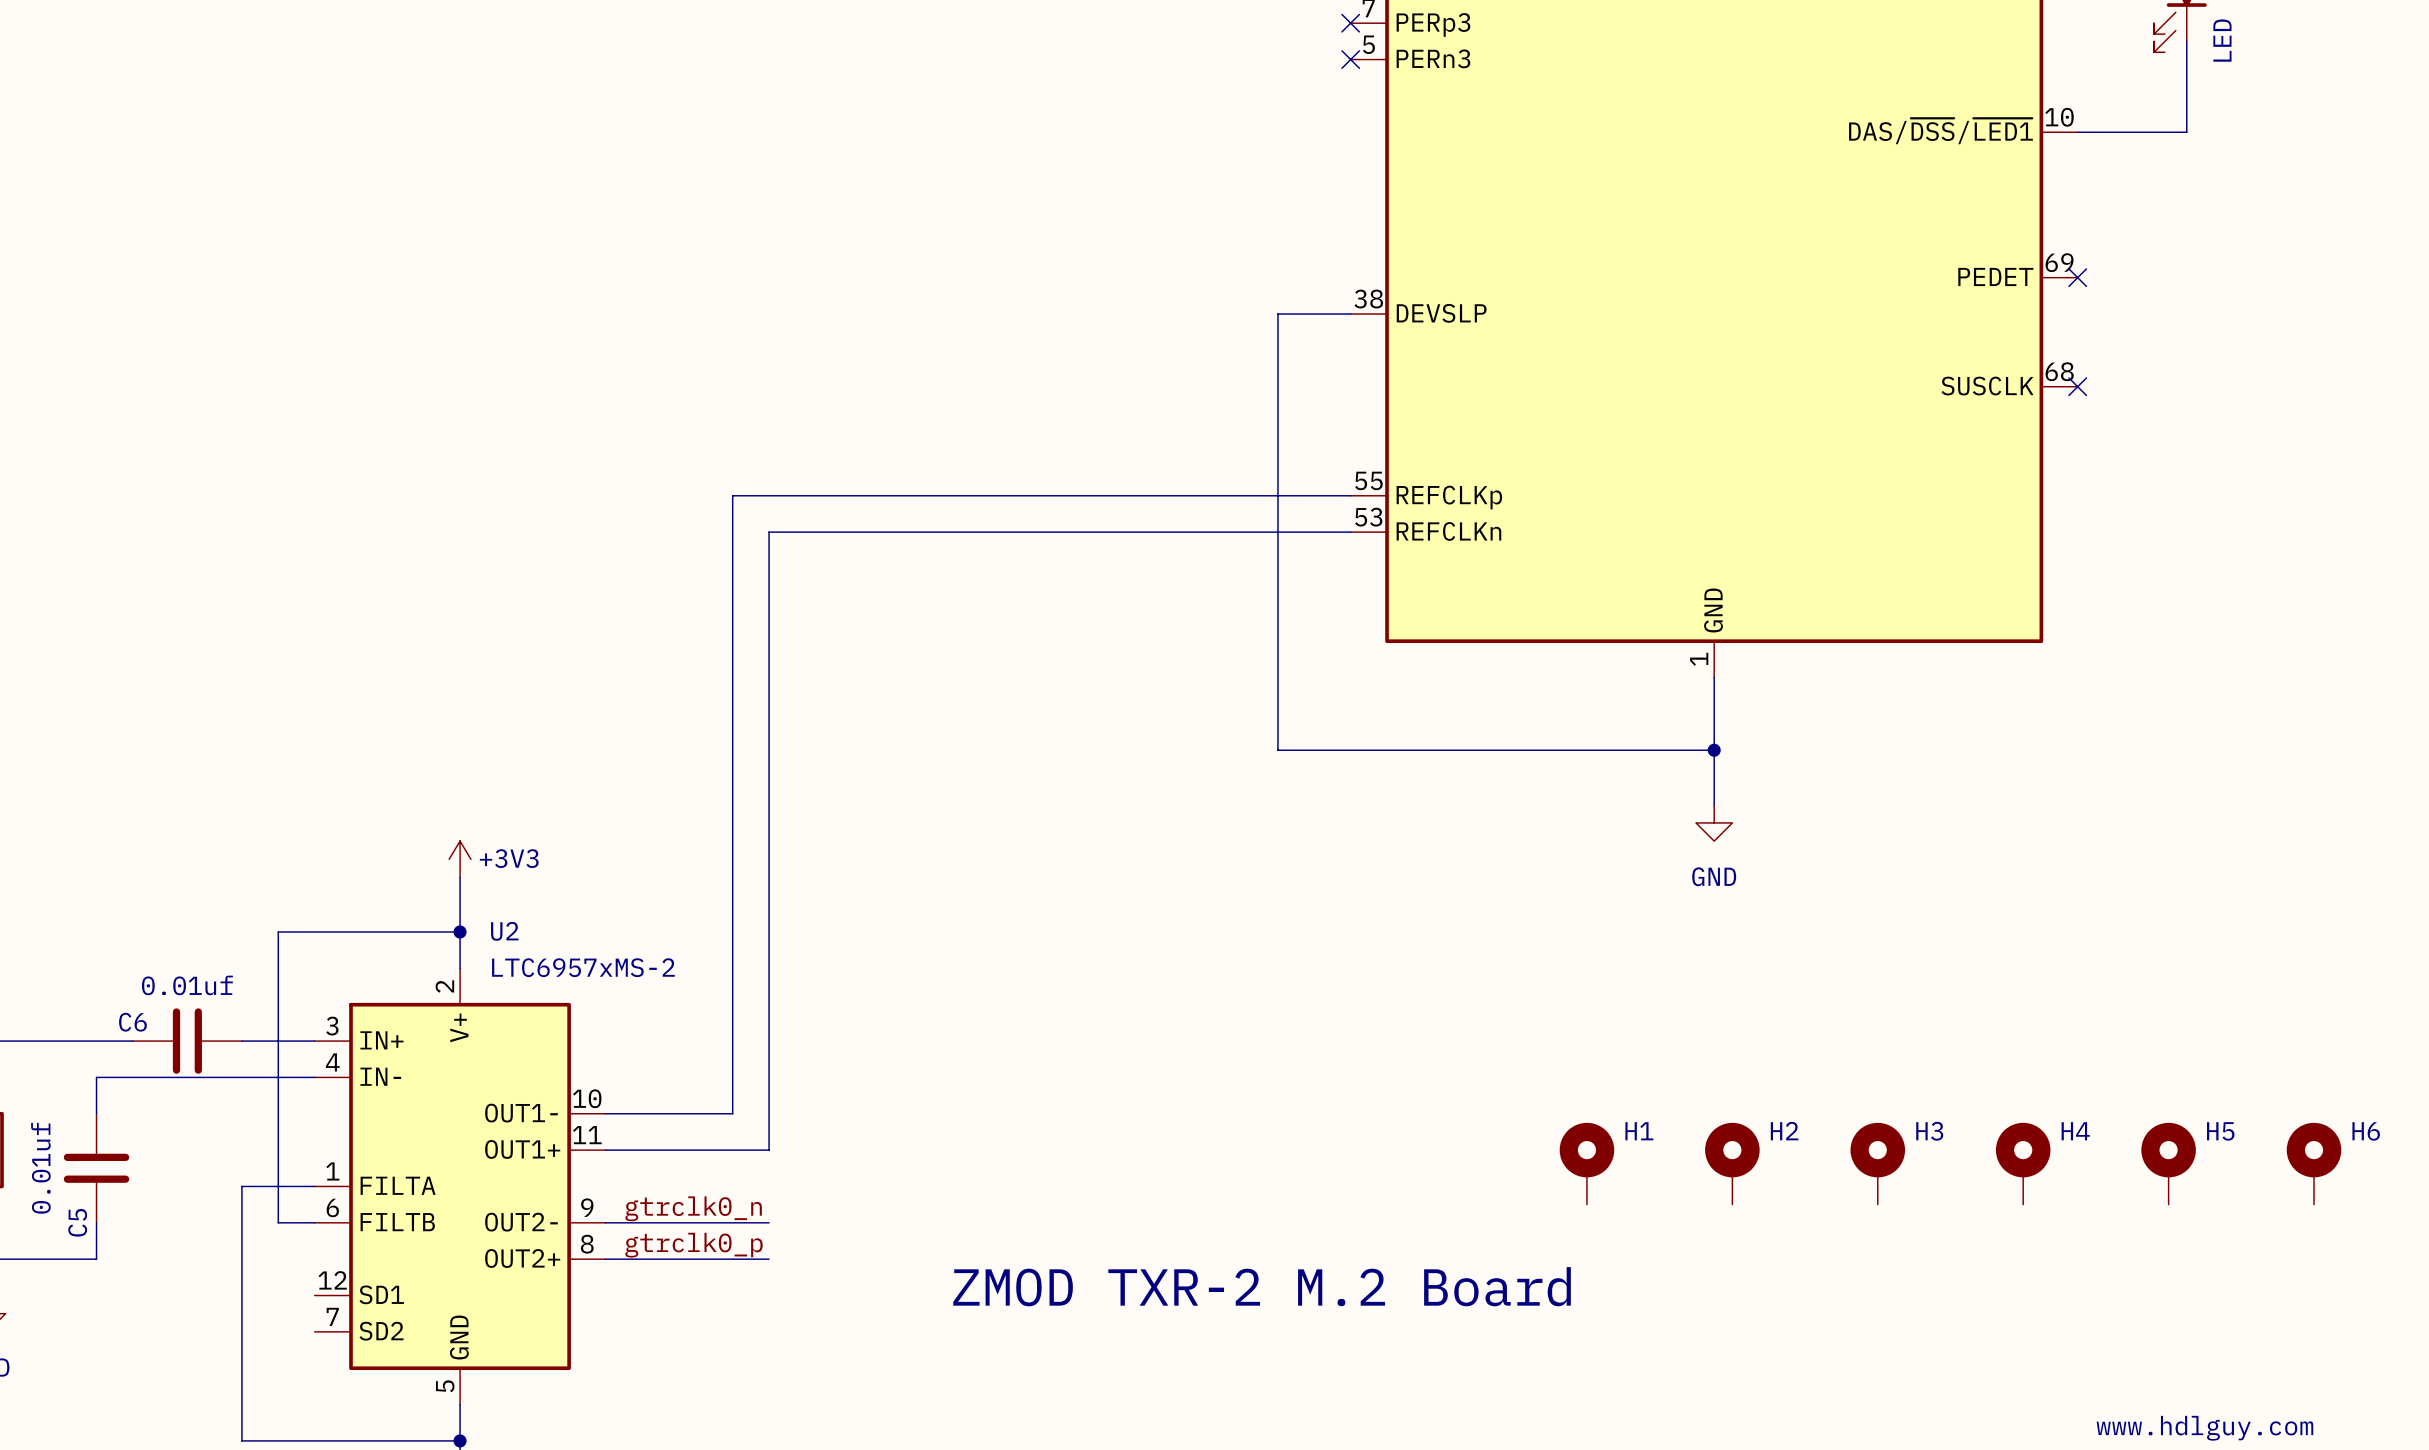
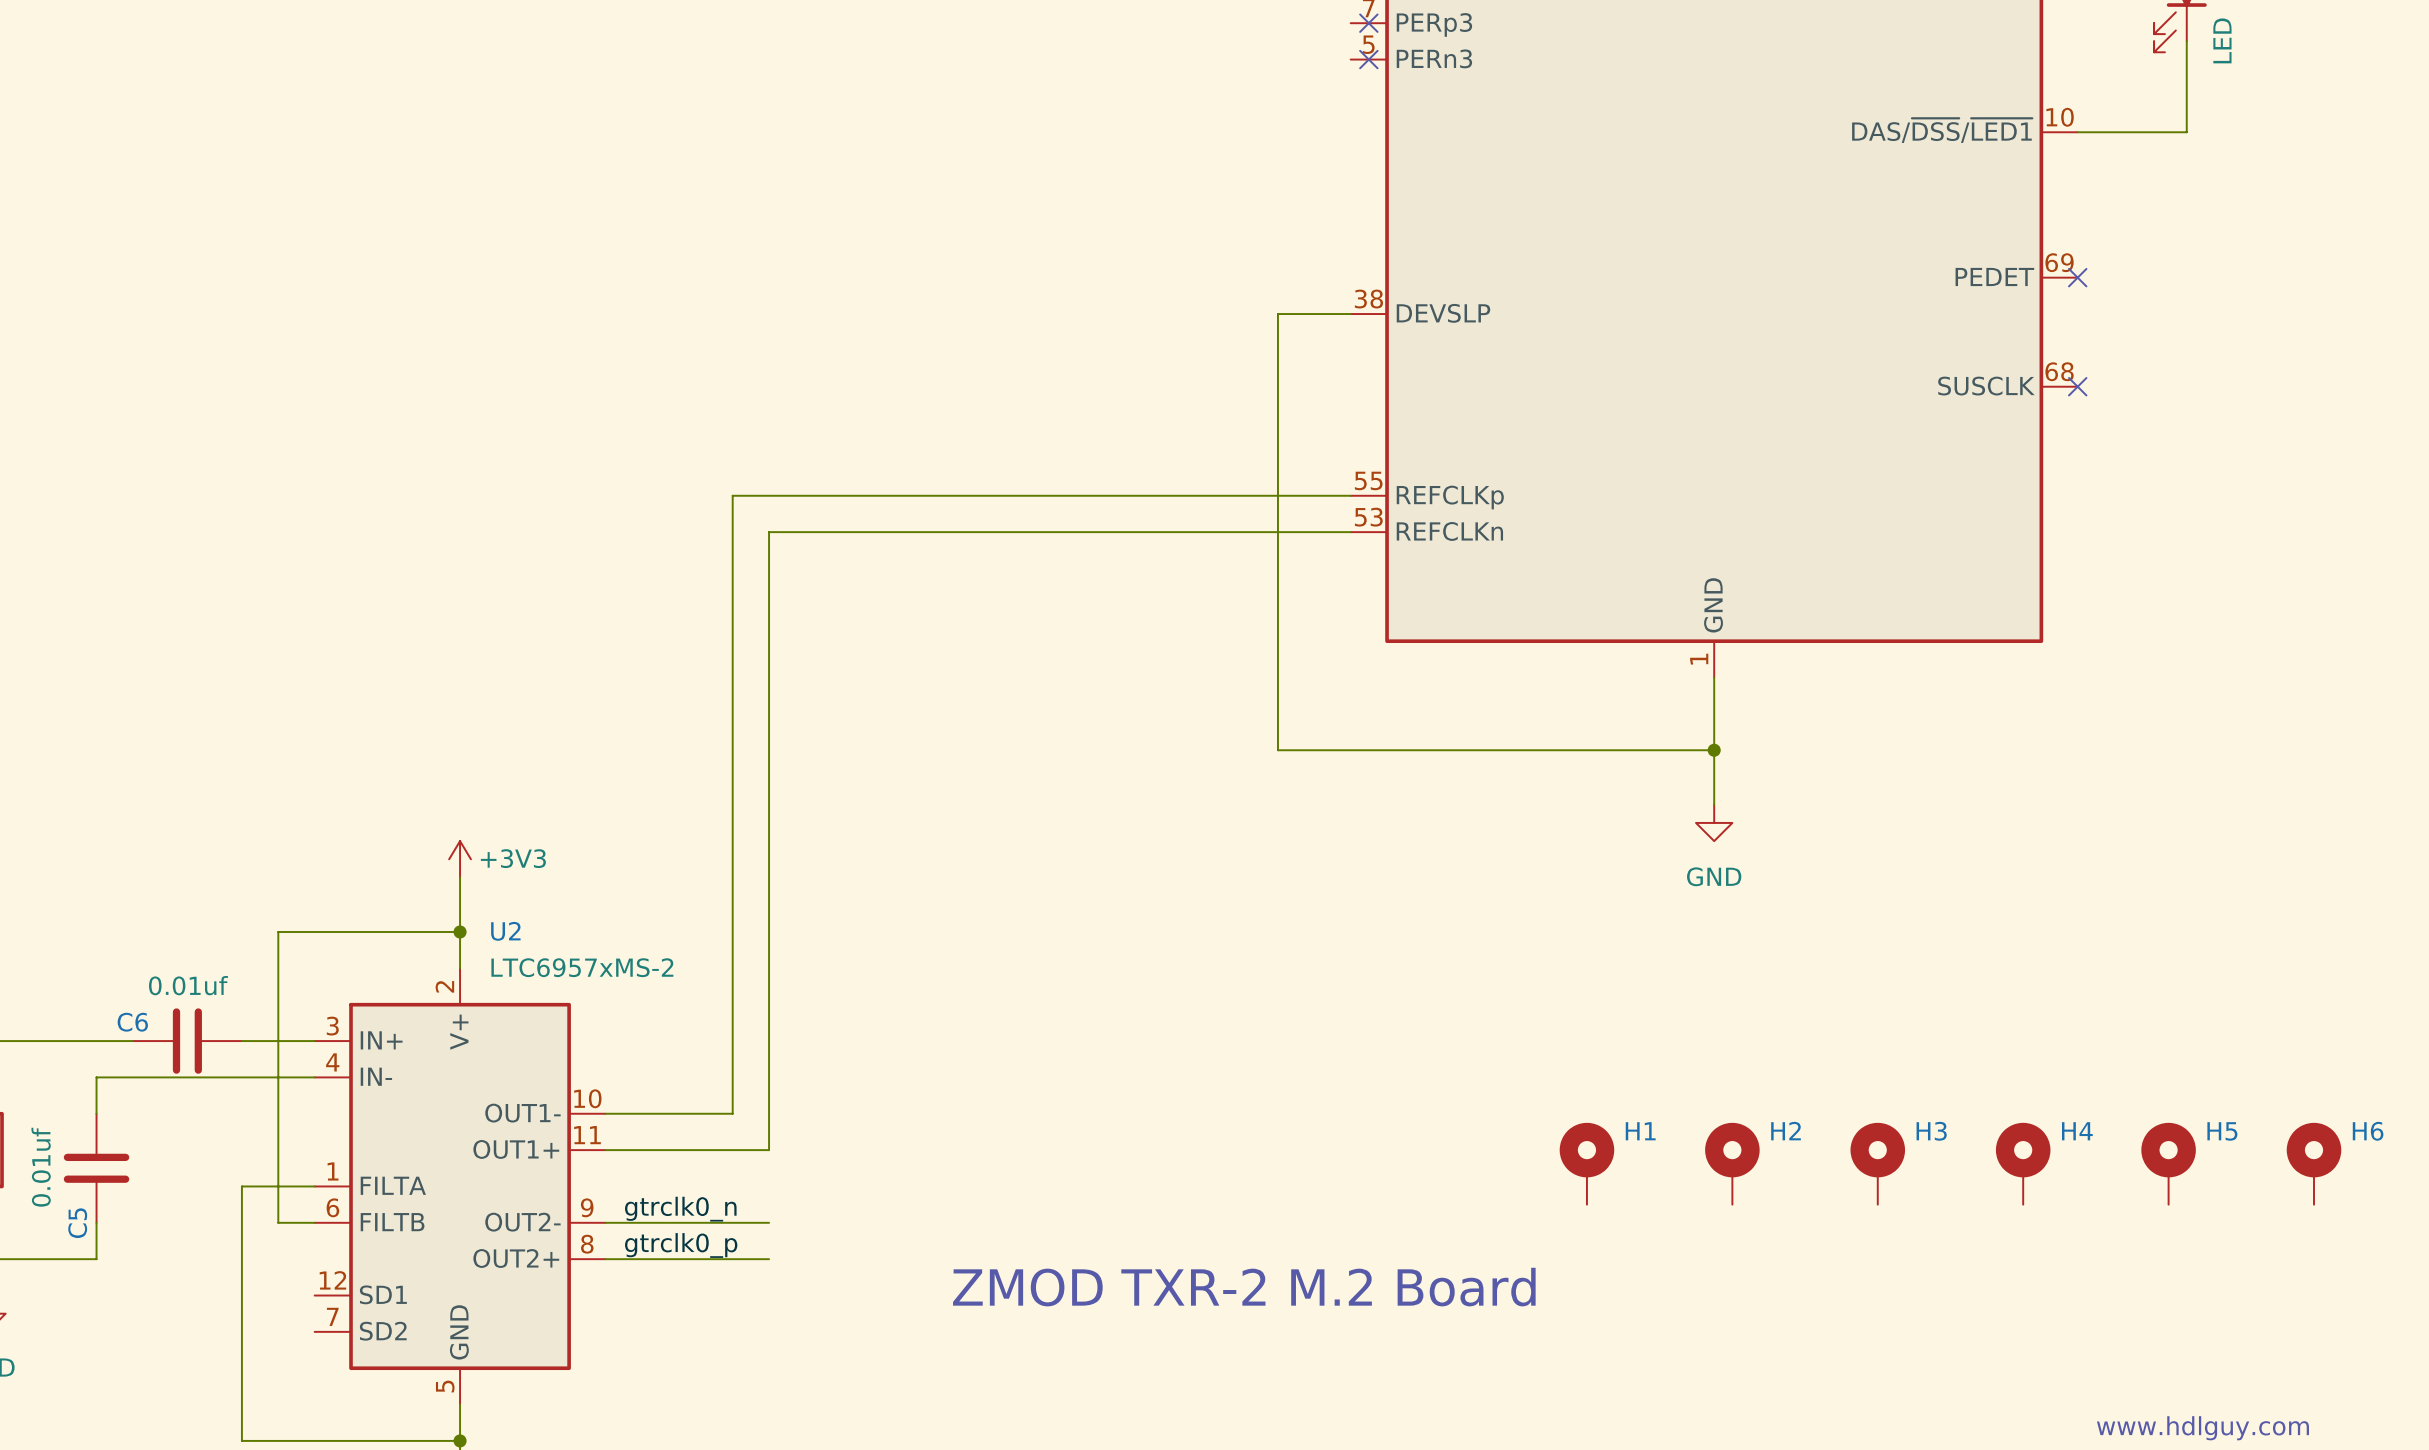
no-connect mark position: (1350, 23) -> (1368, 23)
no-connect mark position: (1350, 59) -> (1368, 59)

